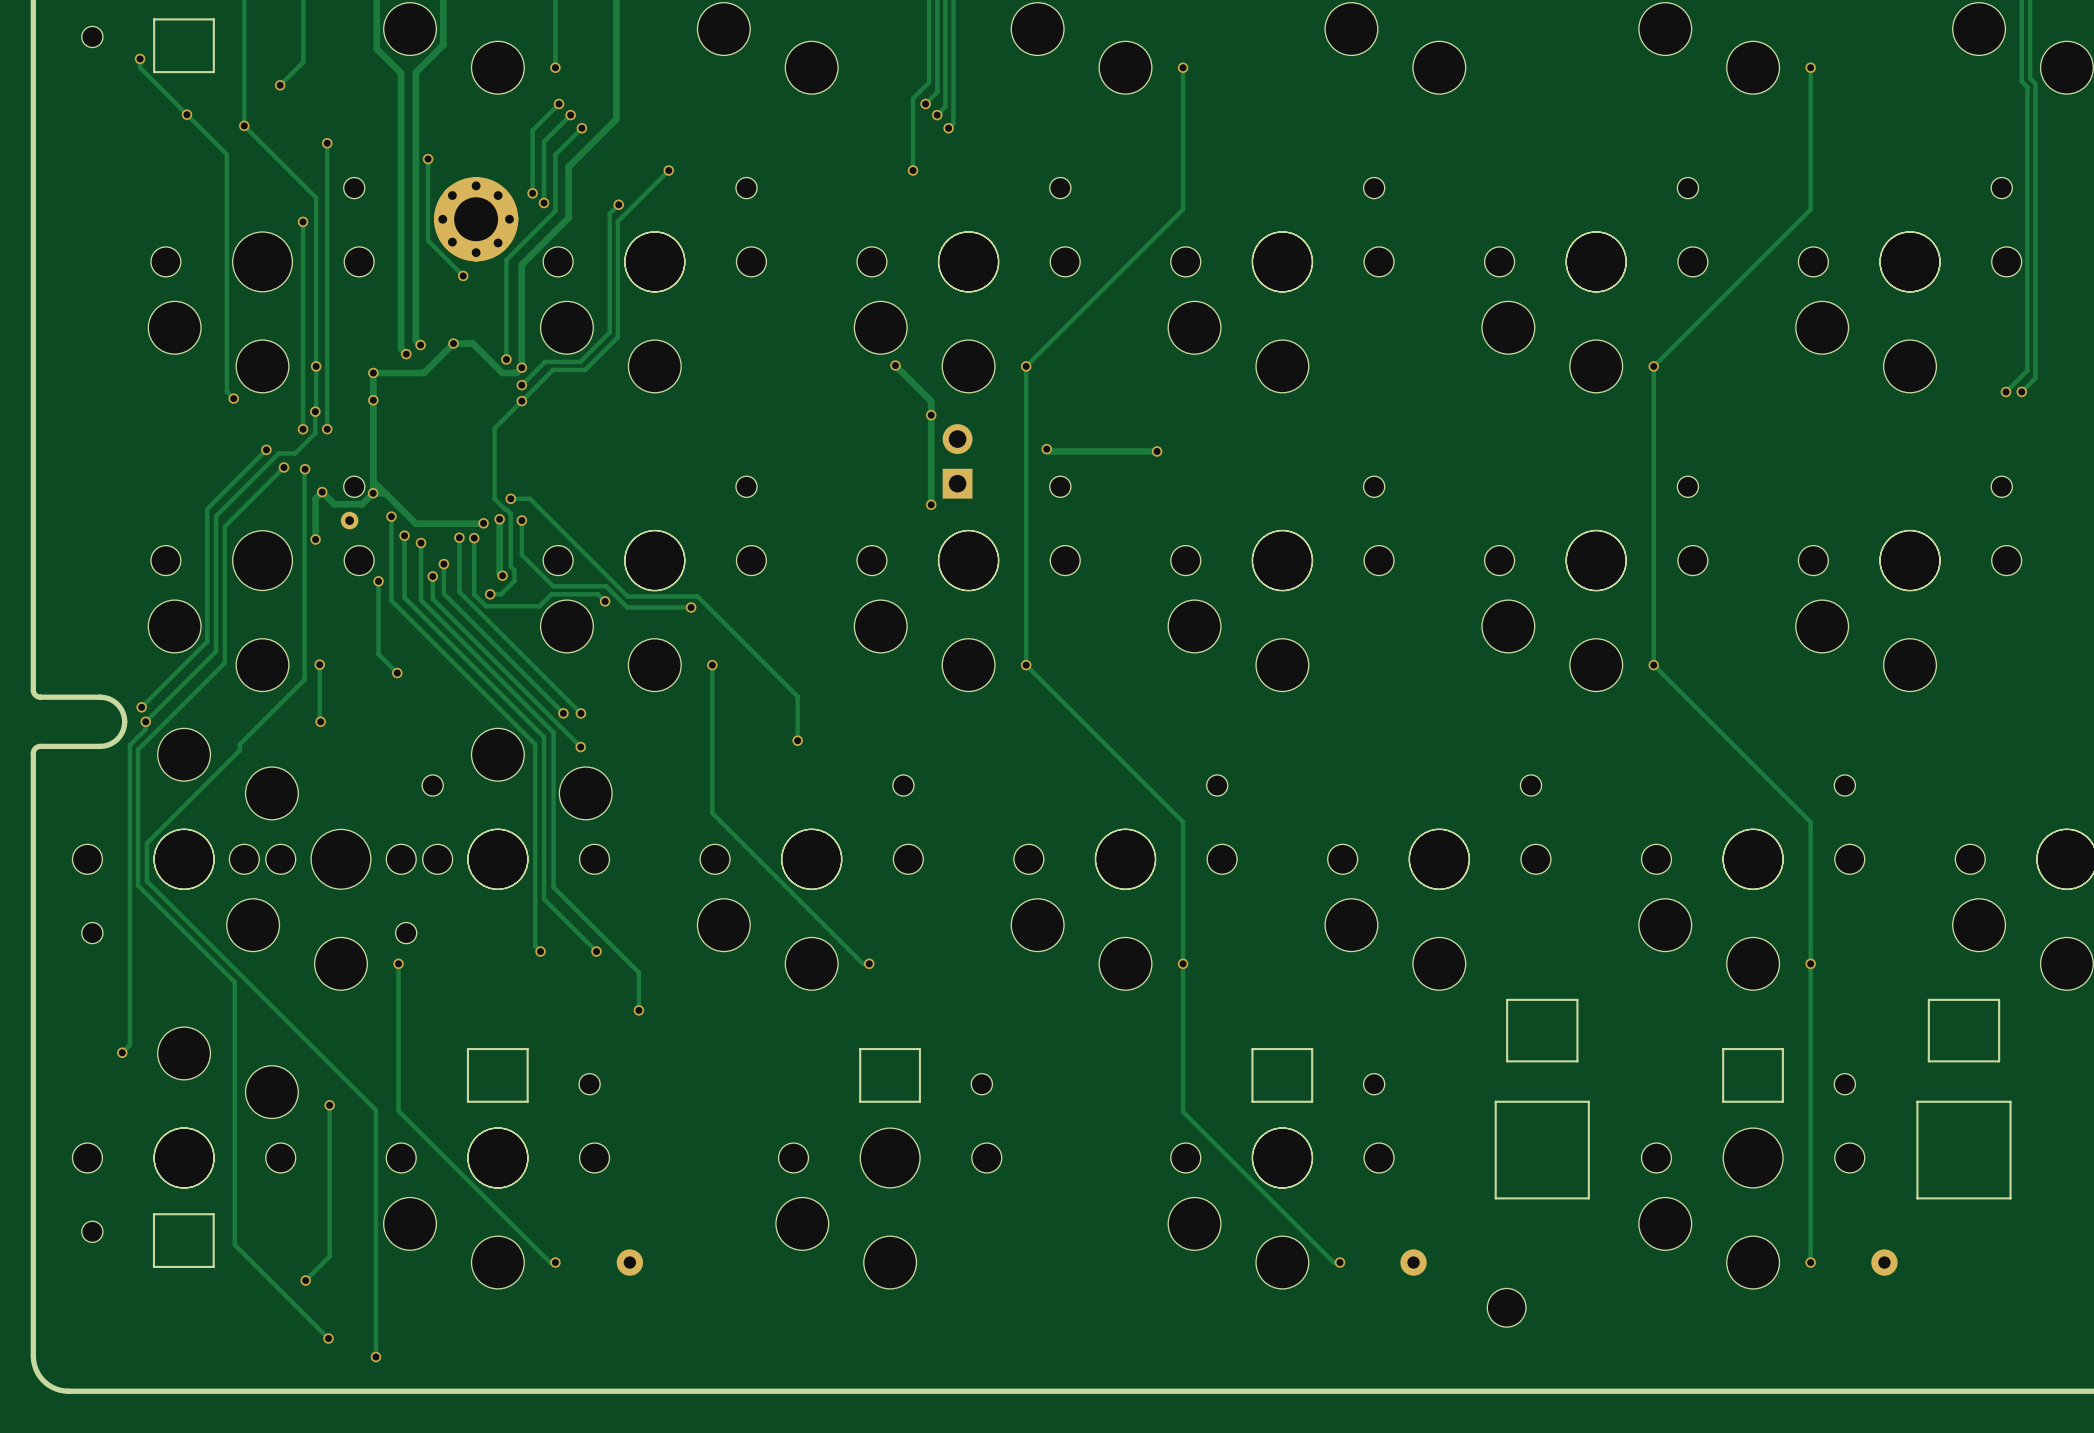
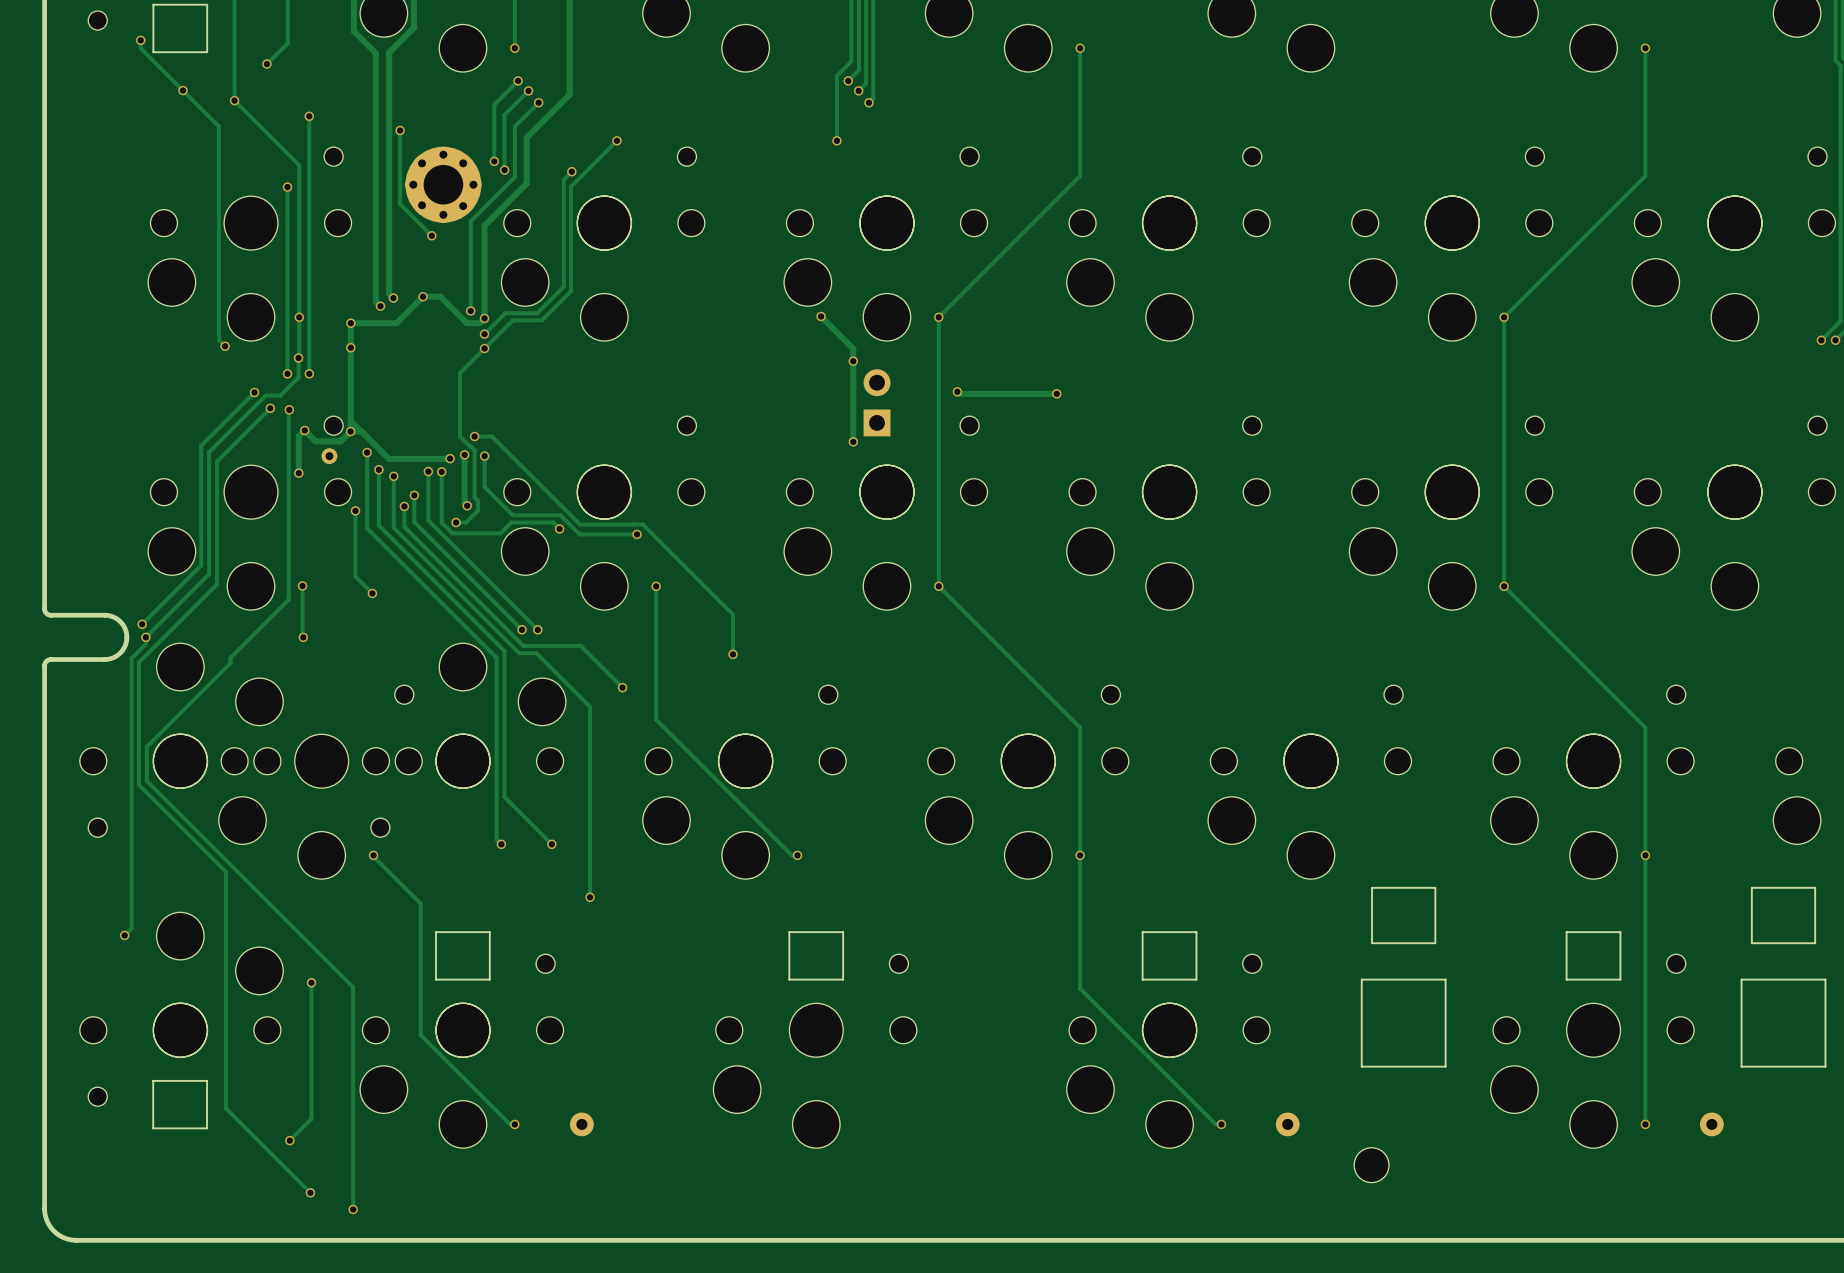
track: (564, 731) (580, 747) -> (523, 645) (580, 645) (622, 687)
track: (553, 732) (553, 887) (638, 972) -> (513, 647) (519, 653) (536, 653) (590, 706) (590, 863)
via position: (580, 747) -> (622, 687)
track: (398, 965) (398, 1110) (450, 1163) -> (373, 856) (420, 903) (420, 1035)

